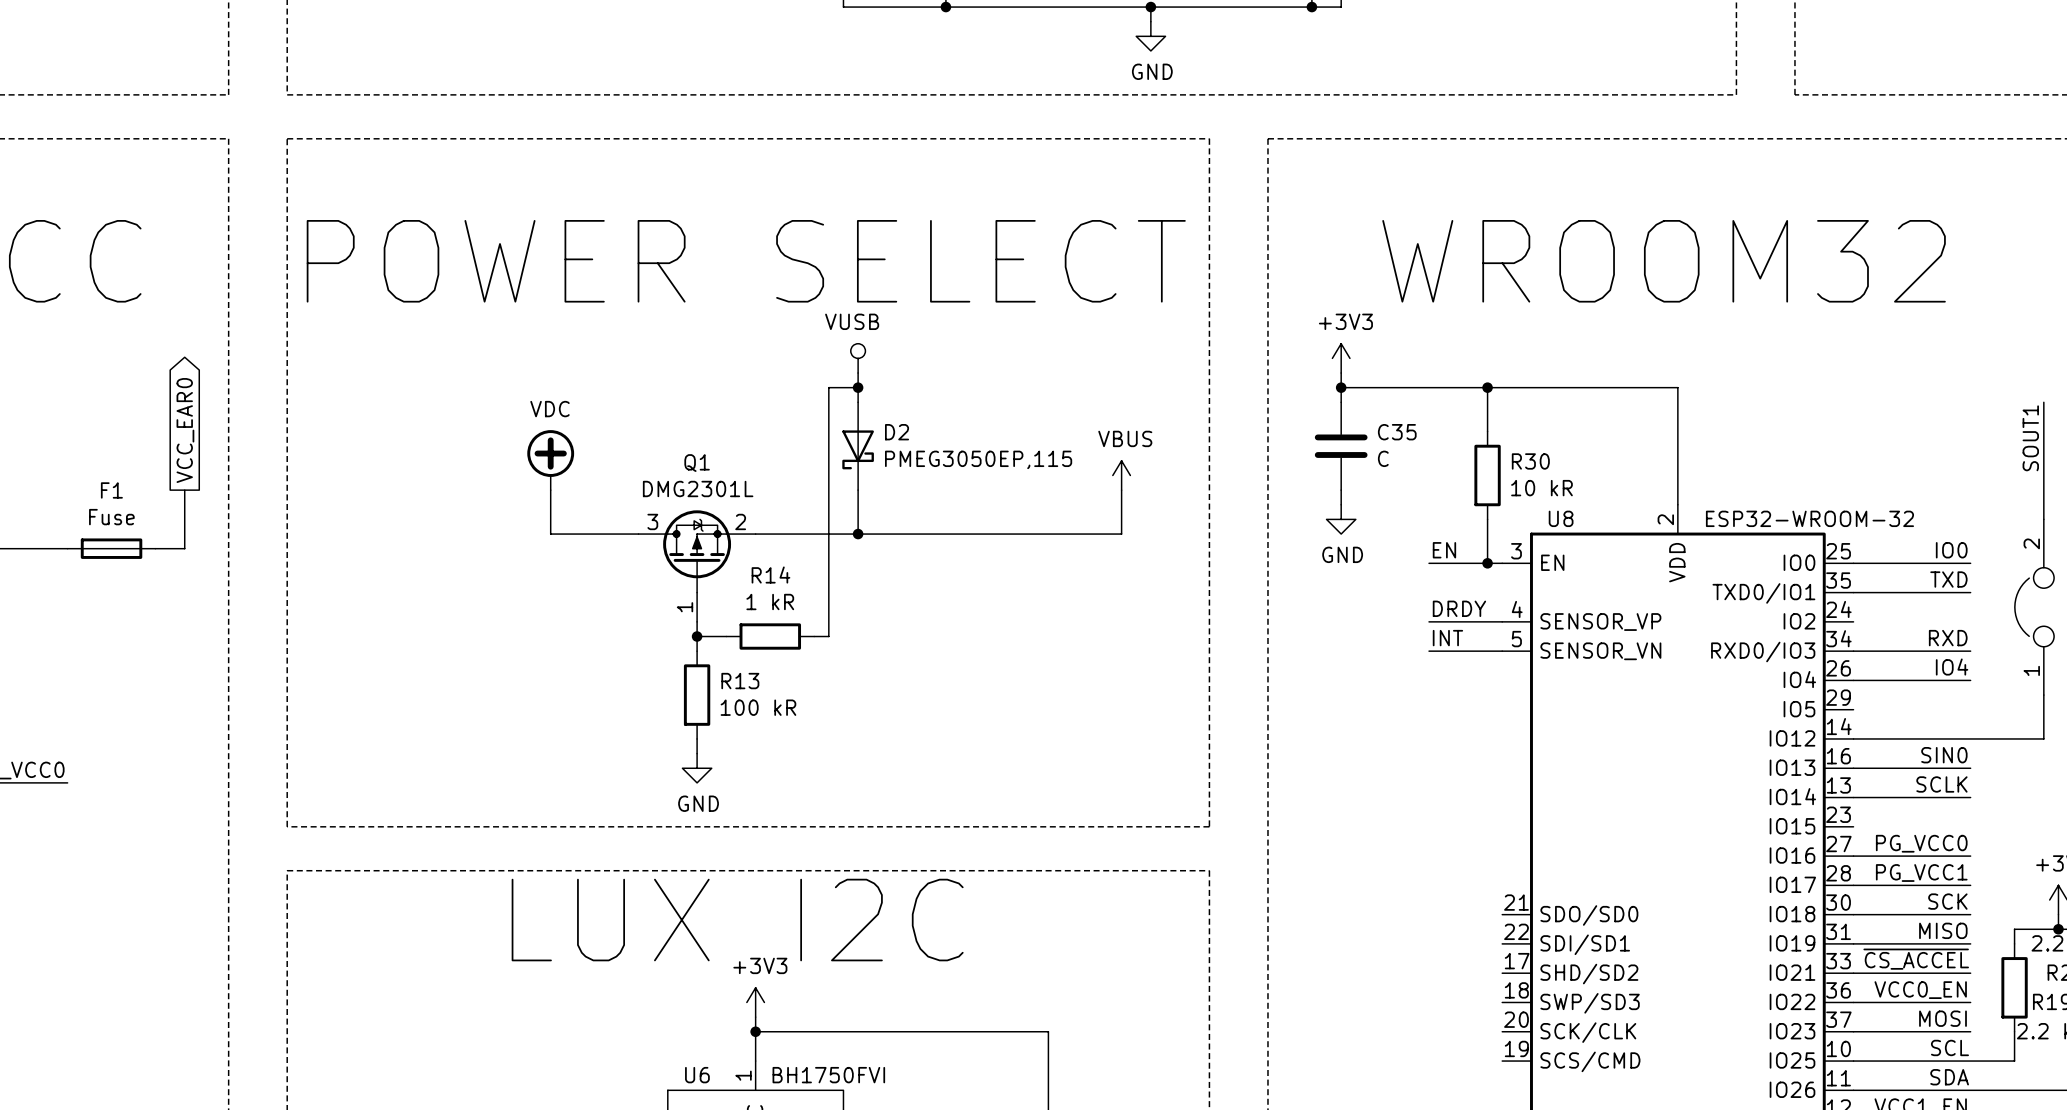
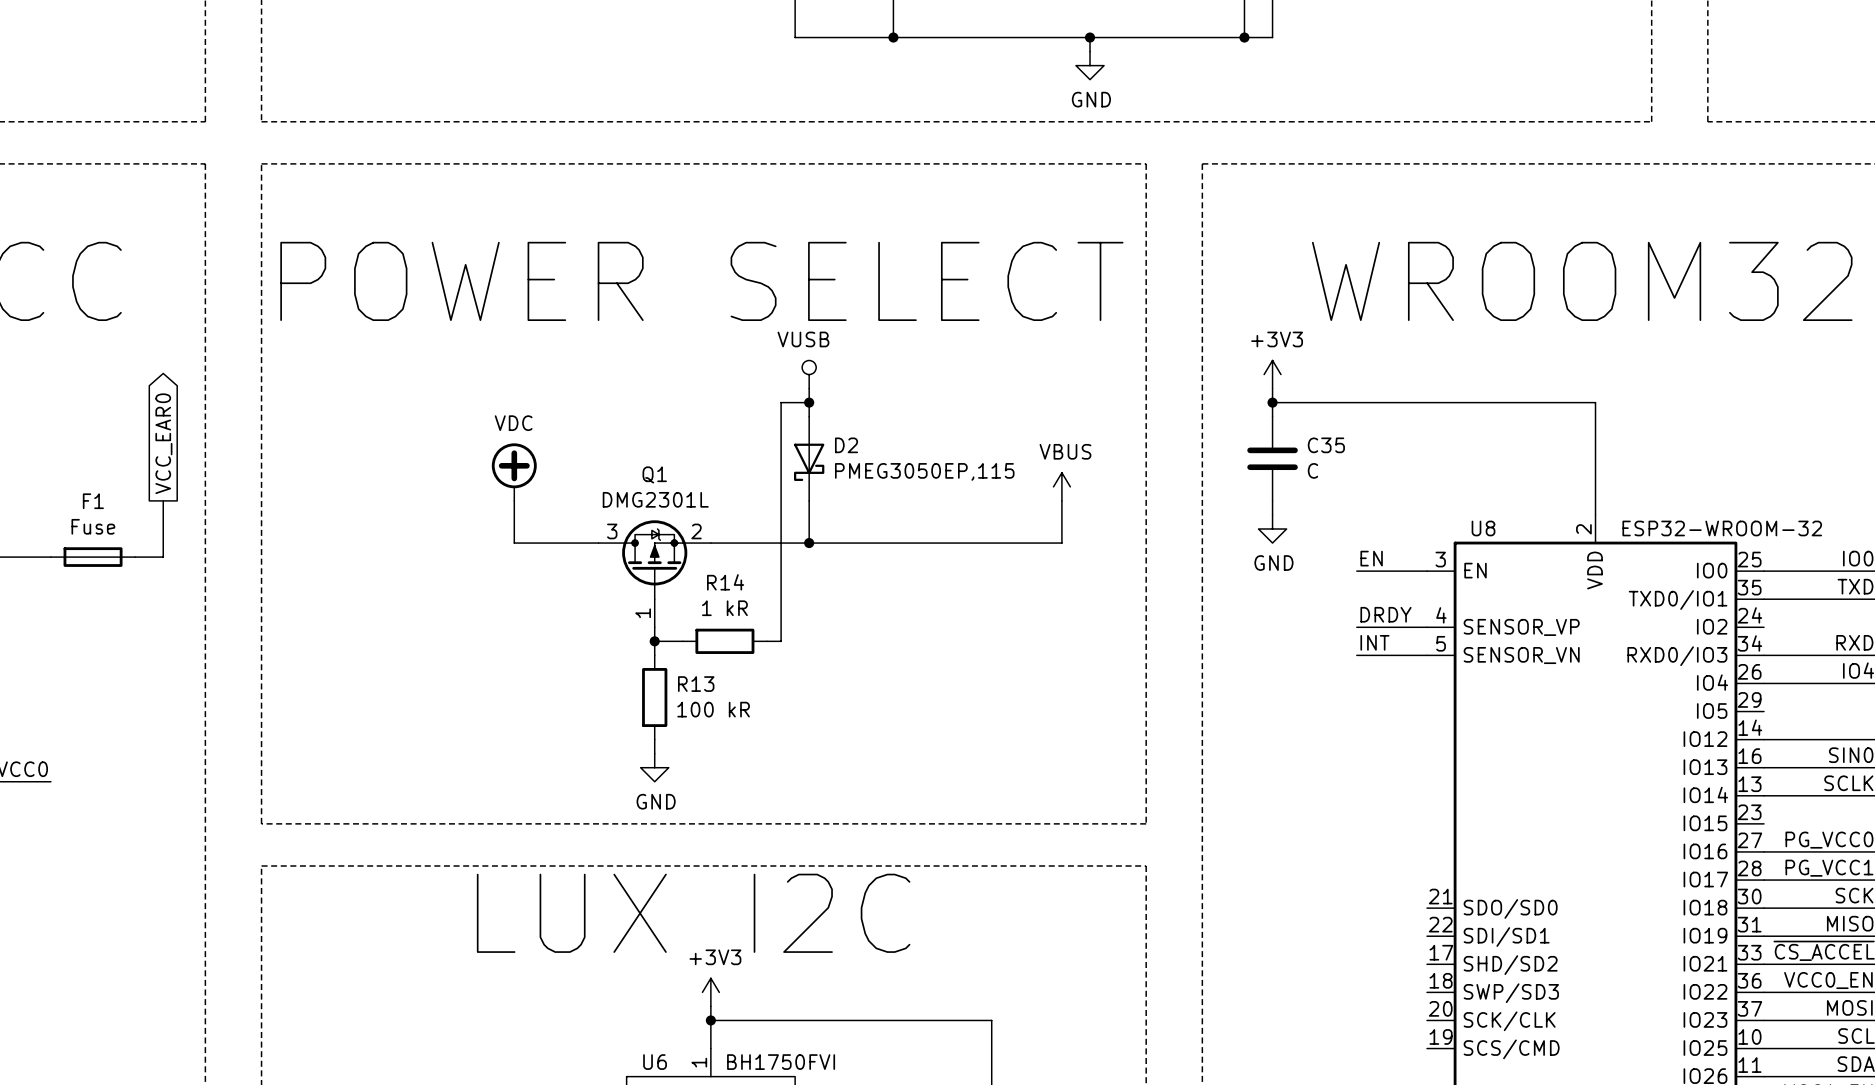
wire: (1487, 387) (1487, 431) -> none
junction: (1487, 387) -> none
R30: 10 kR (1487, 475) -> none
wire: (1487, 519) (1487, 563) -> none
junction: (1487, 563) -> none

